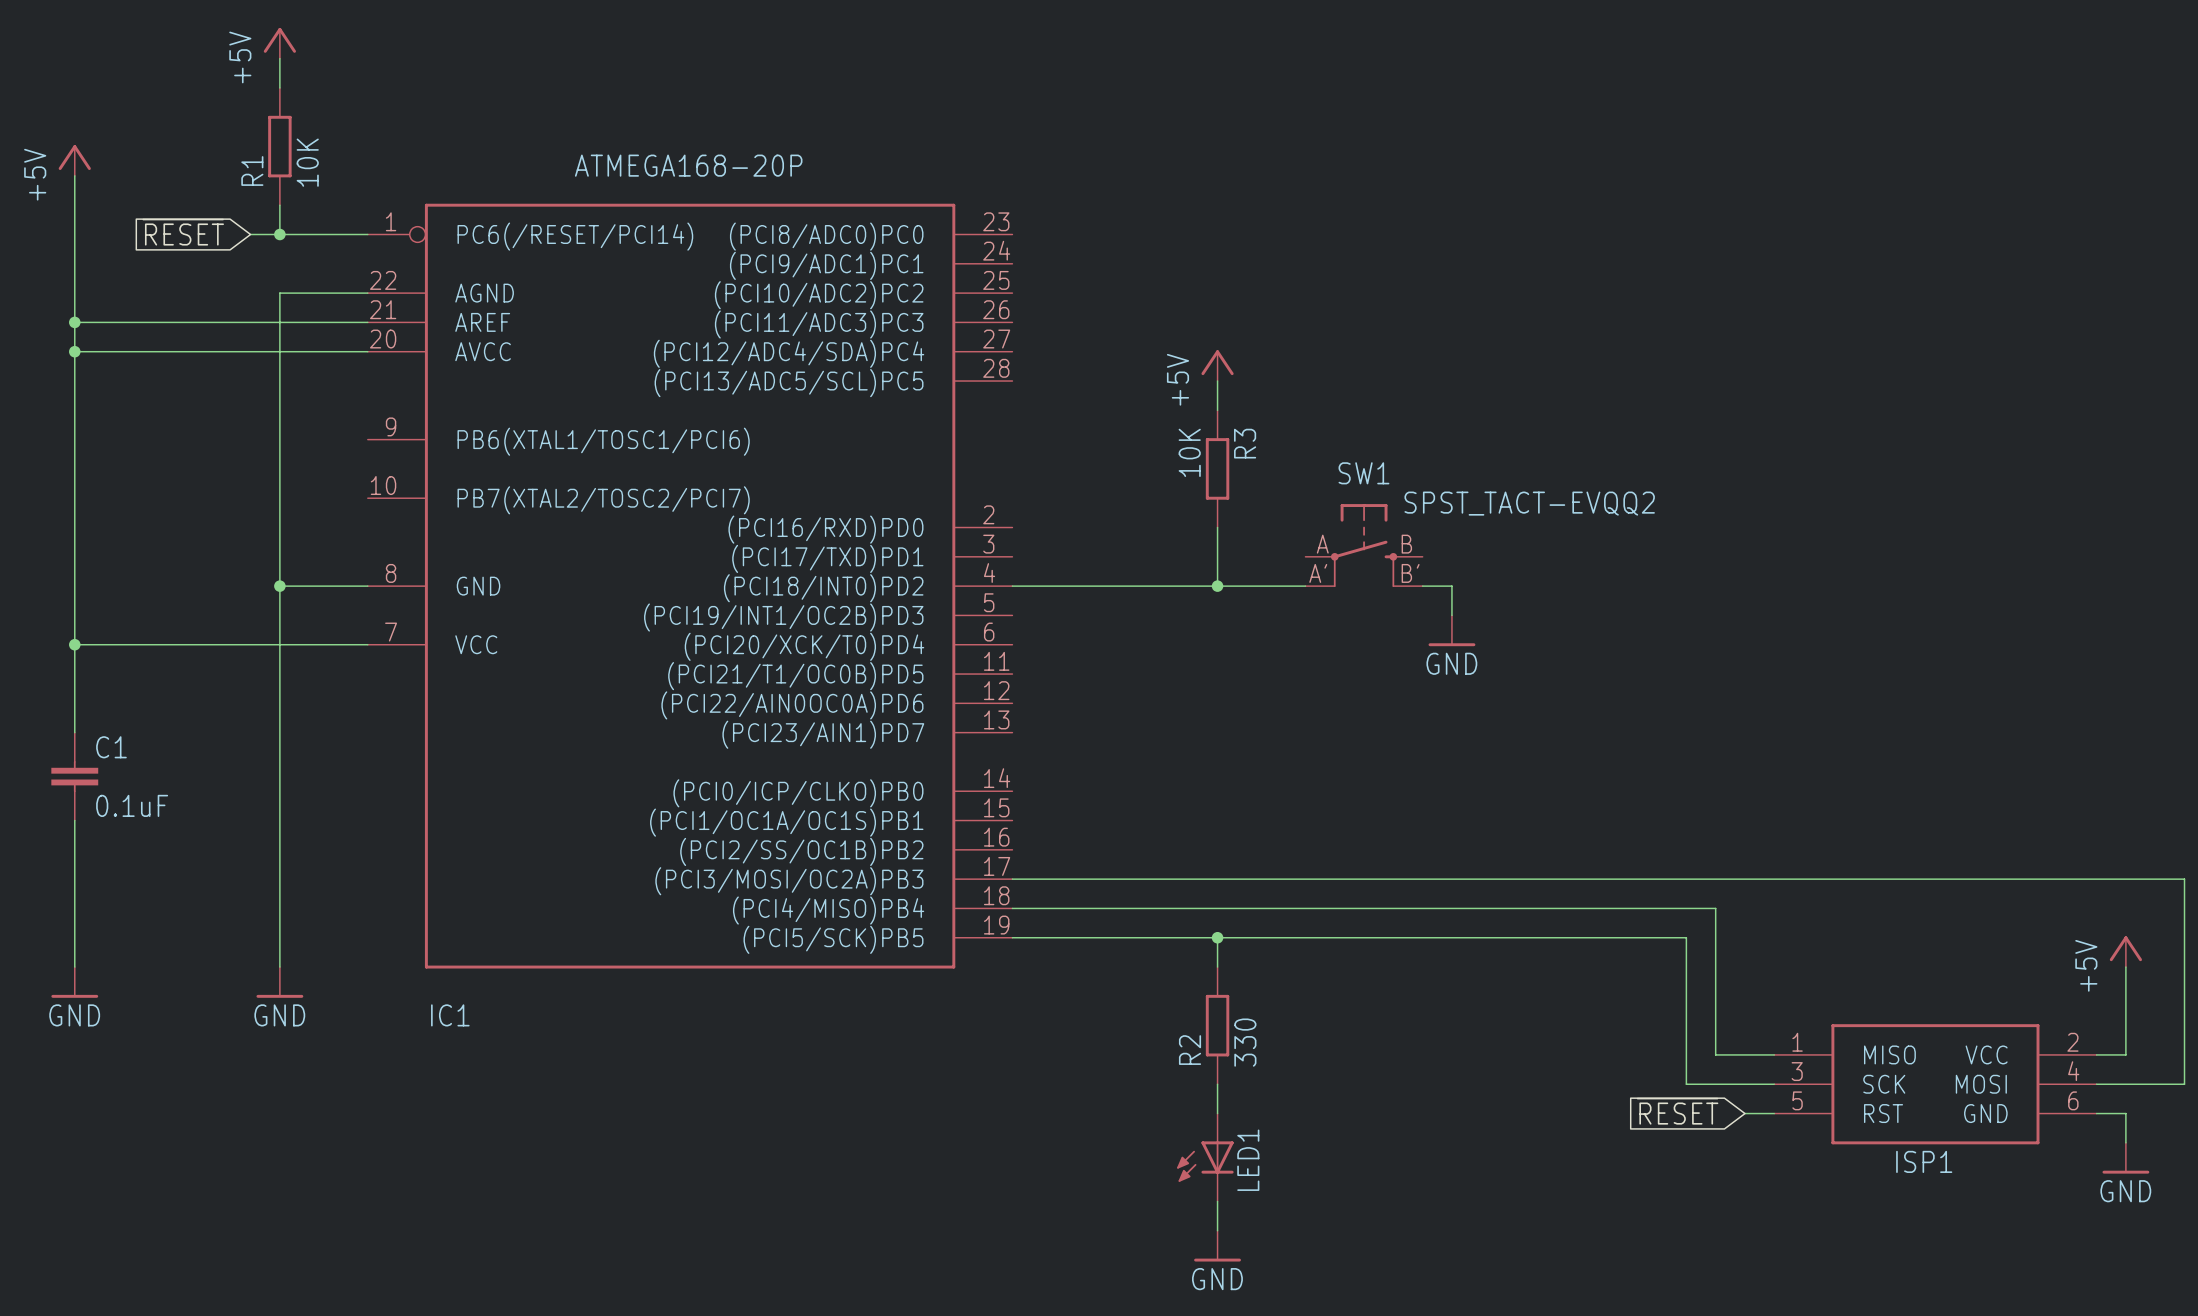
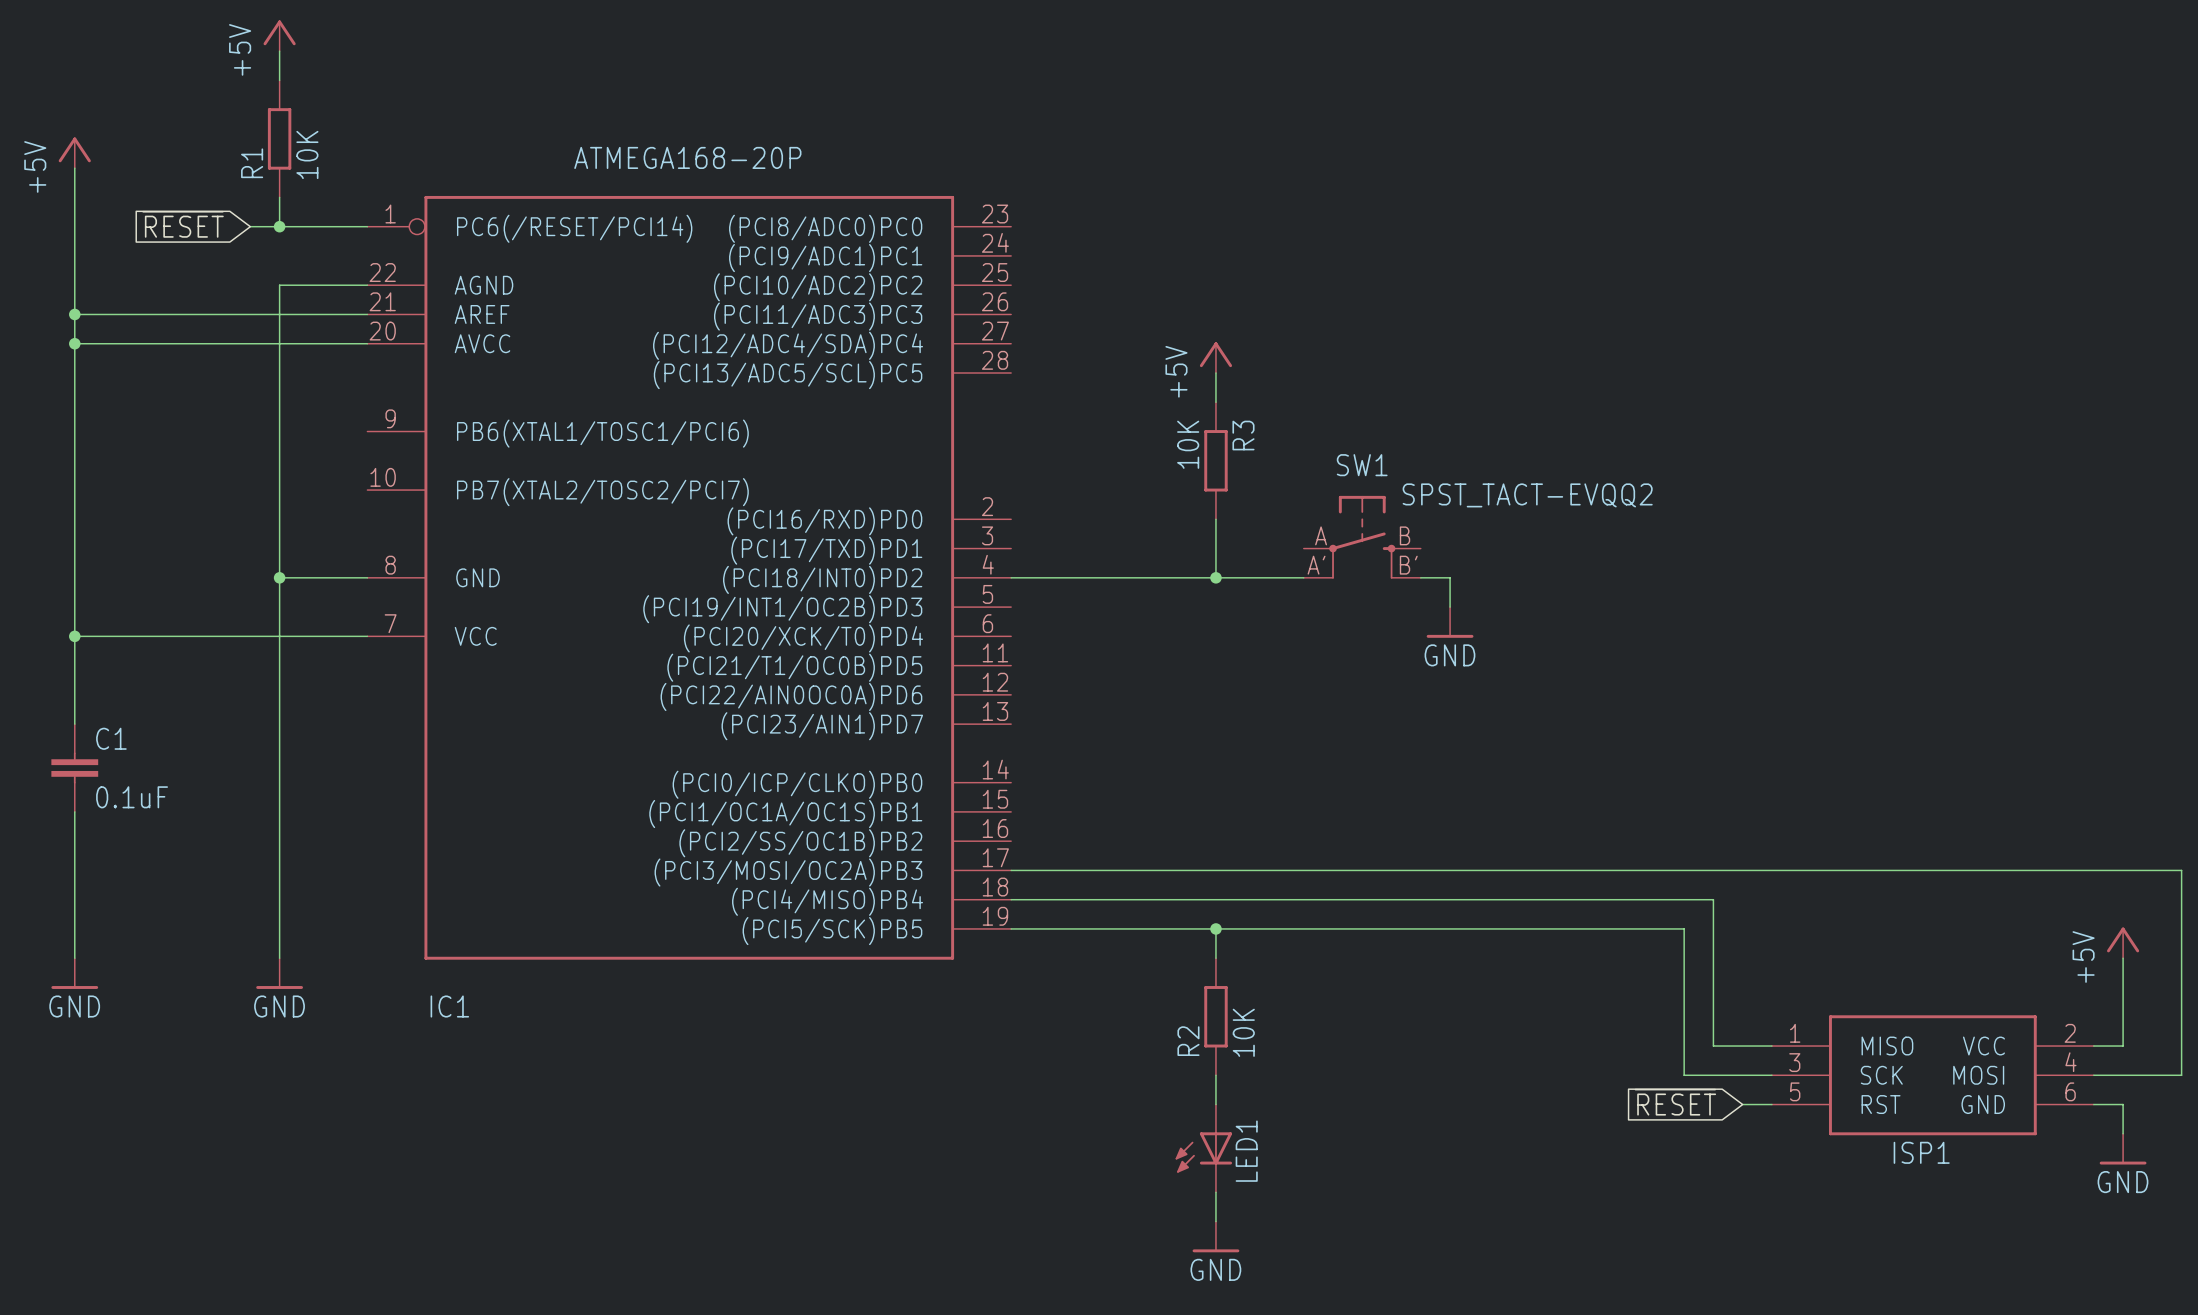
R2 value: 330 (1245, 1042) -> 10K (1243, 1032)

